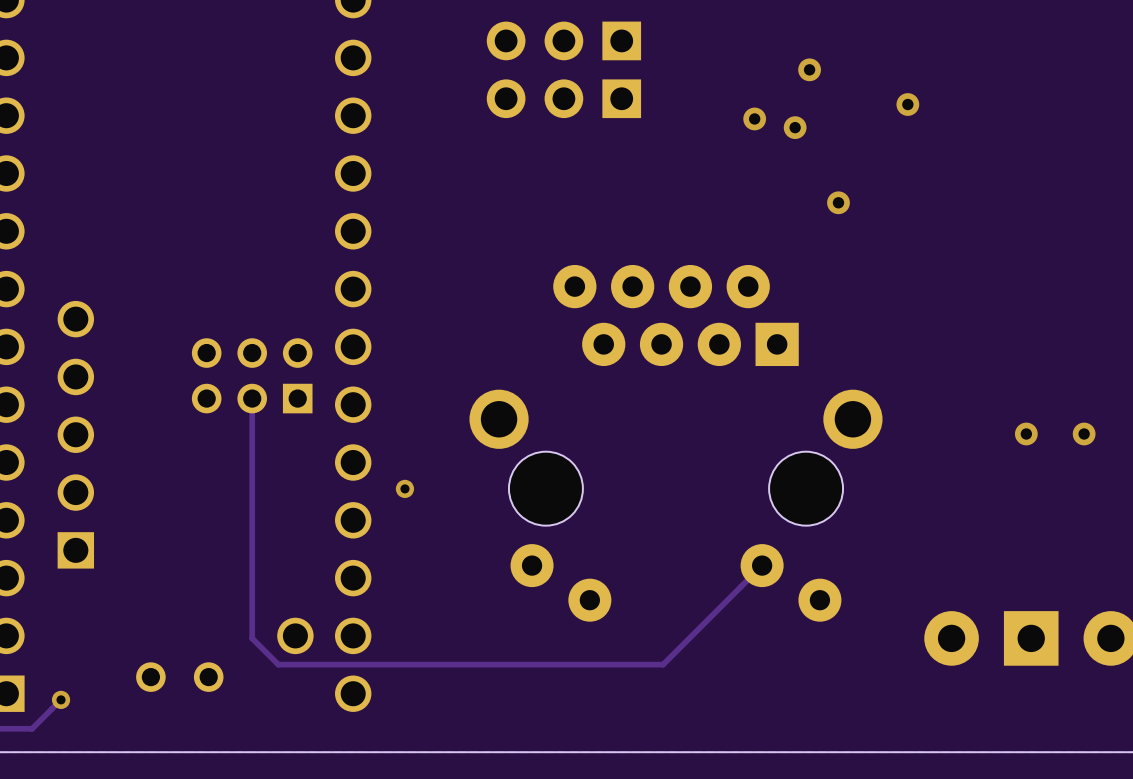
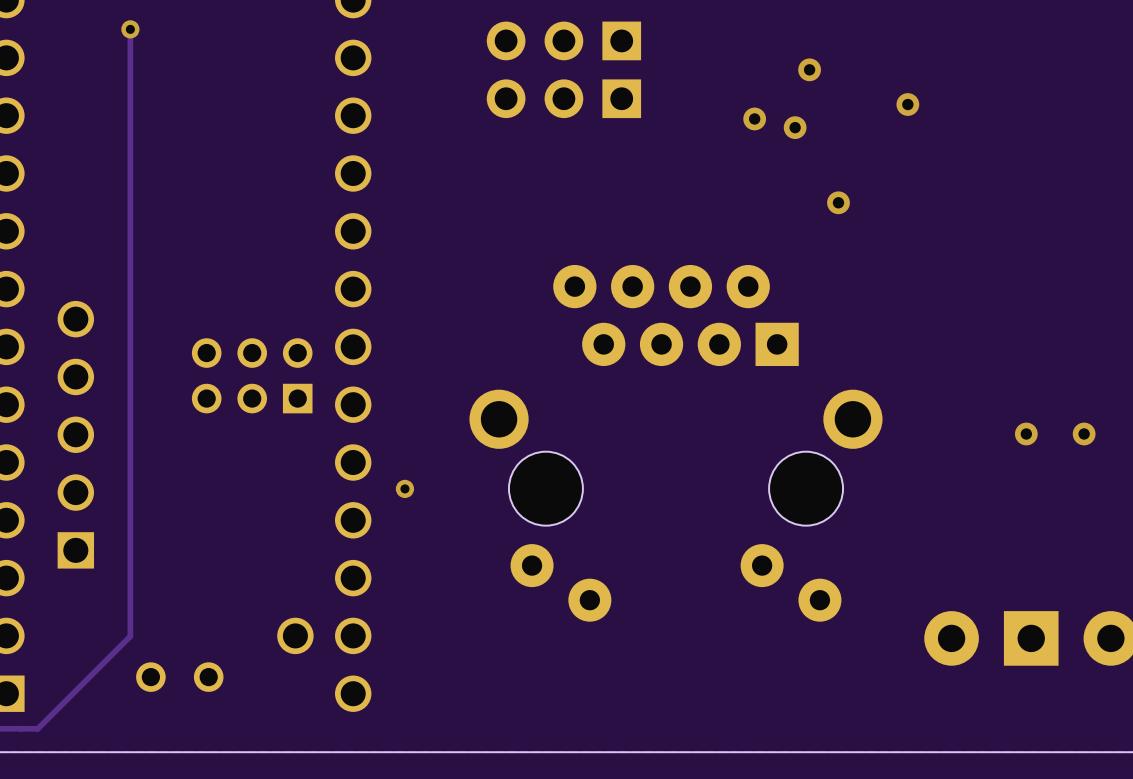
via: none -> (130, 29)
track: (252, 398) (252, 638) (278, 664) (663, 664) (762, 565) -> none
track: (61, 699) (32, 728) -> (130, 29) (130, 636) (37, 728) (32, 728)
via: (61, 699) -> none

